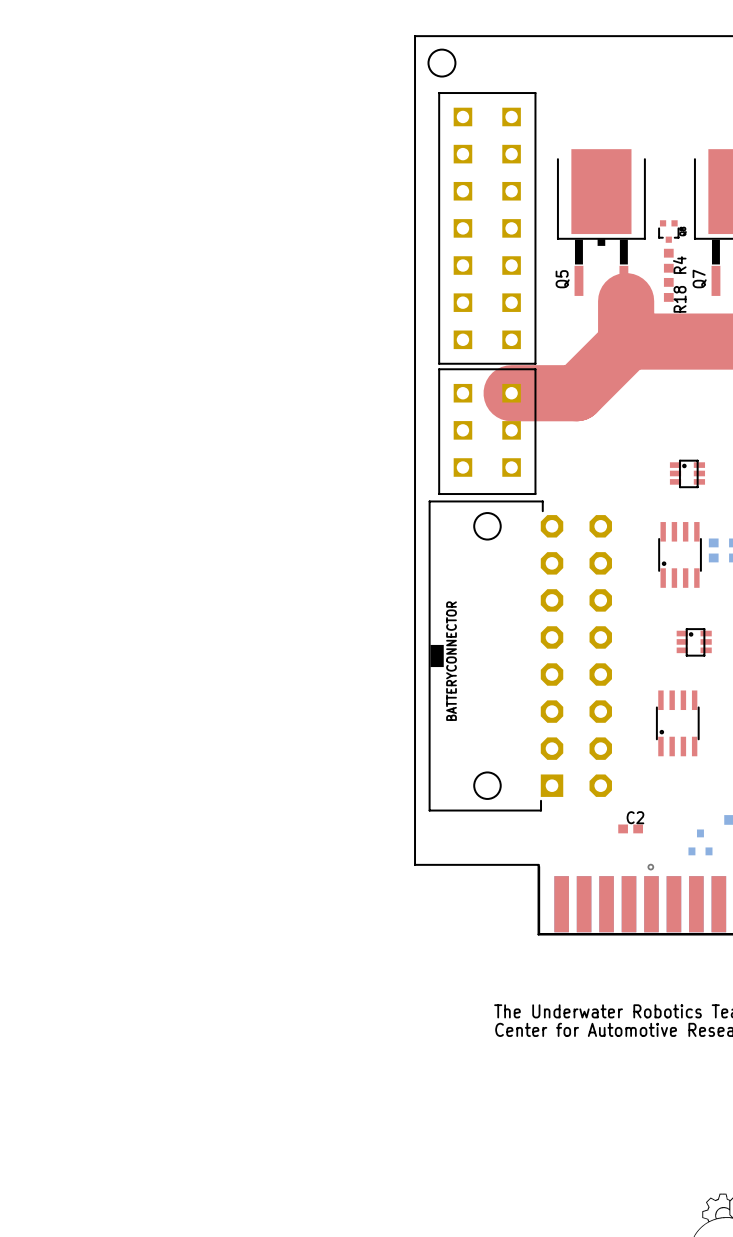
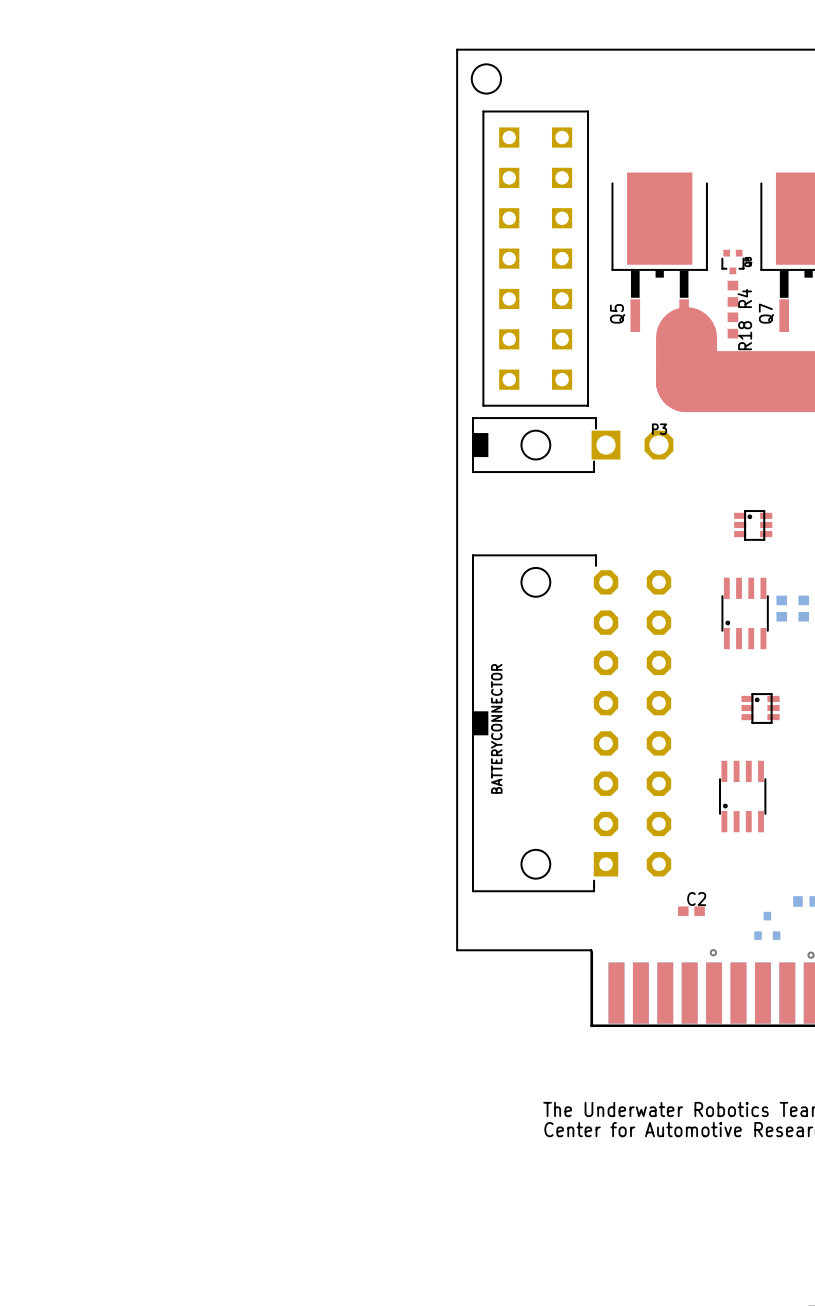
top track: (626, 343) (576, 393) (511, 393) -> none
P3: none -> (572, 445)
part: (487, 431) -> none

